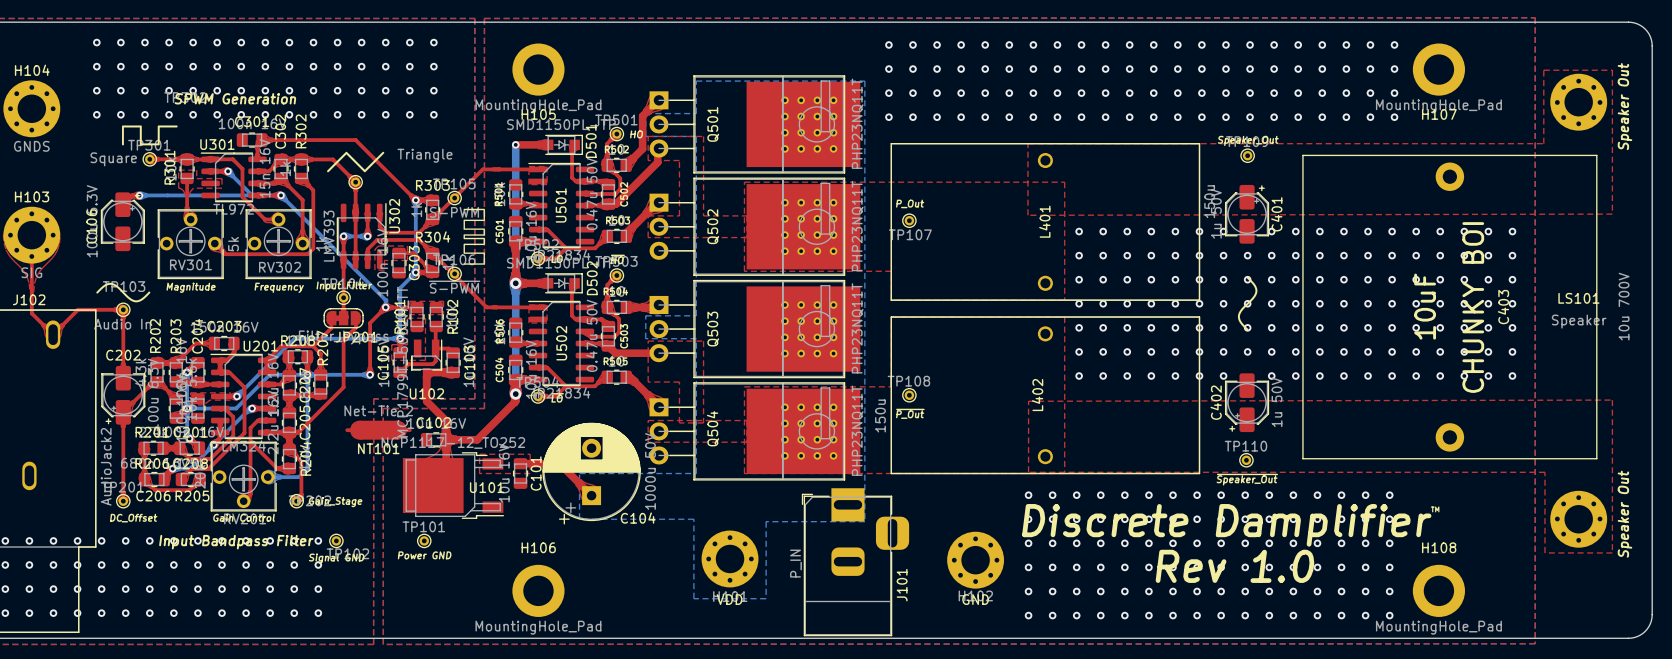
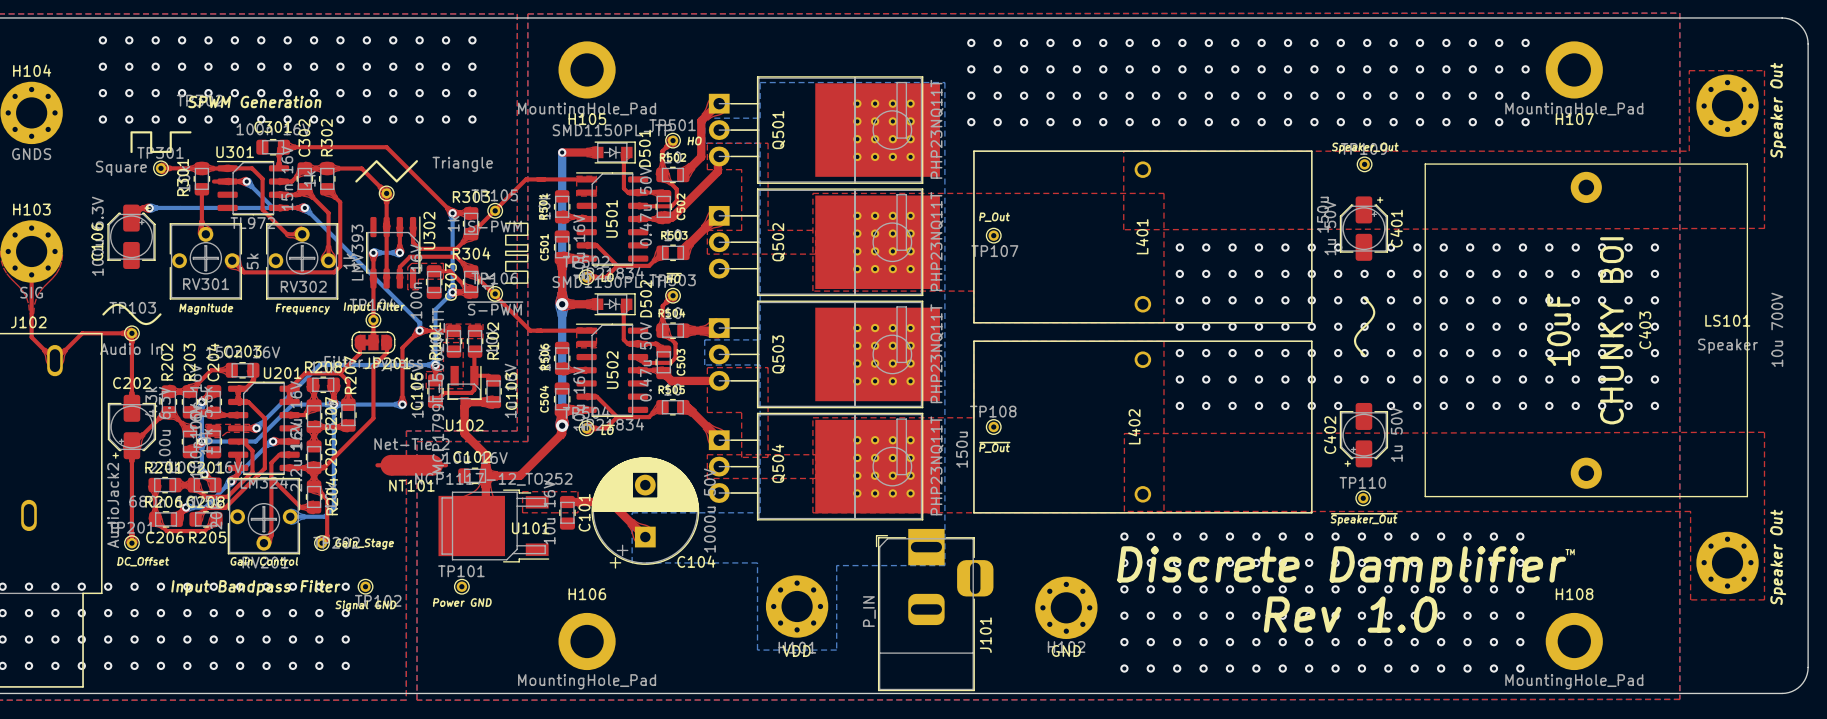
top zone outline: (178, 170) (178, 188) (183, 190) (185, 195) (189, 195) (193, 188) (222, 188) (222, 178) (196, 178) (196, 170) (178, 170) -> none
top track: none -> (213, 181) (221, 181)

